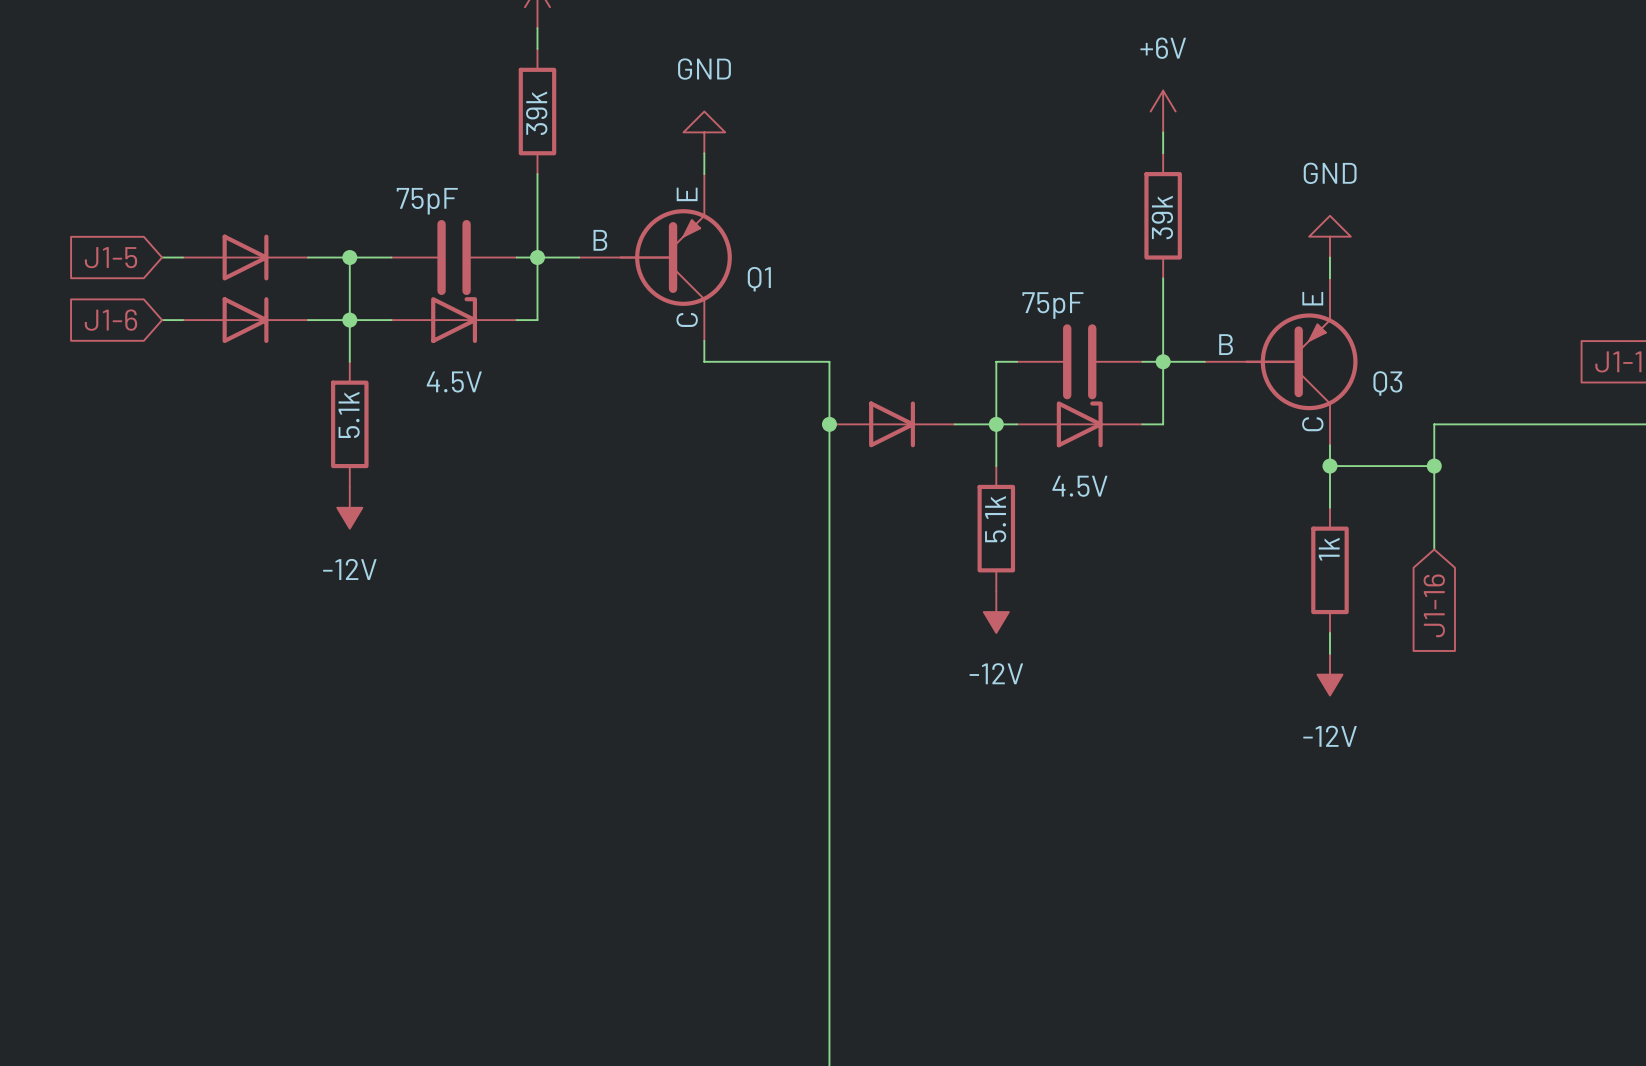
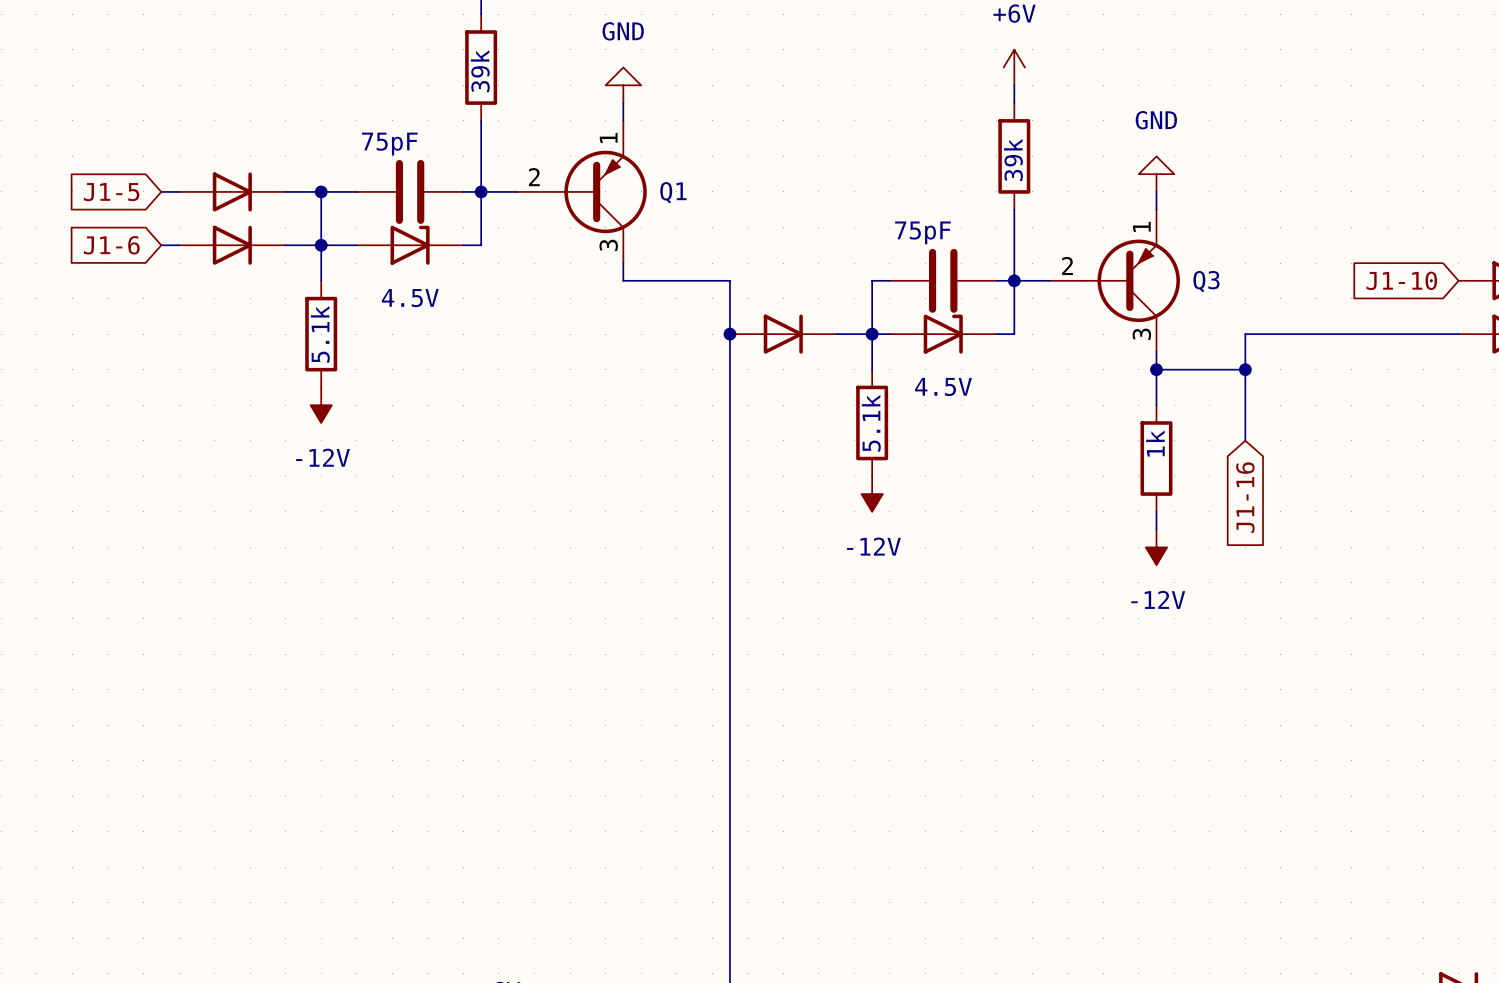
Q1 symbol: [579, 174, 732, 341] -> [516, 120, 647, 264]
Q3 symbol: [1204, 278, 1358, 446] -> [1049, 209, 1180, 352]

